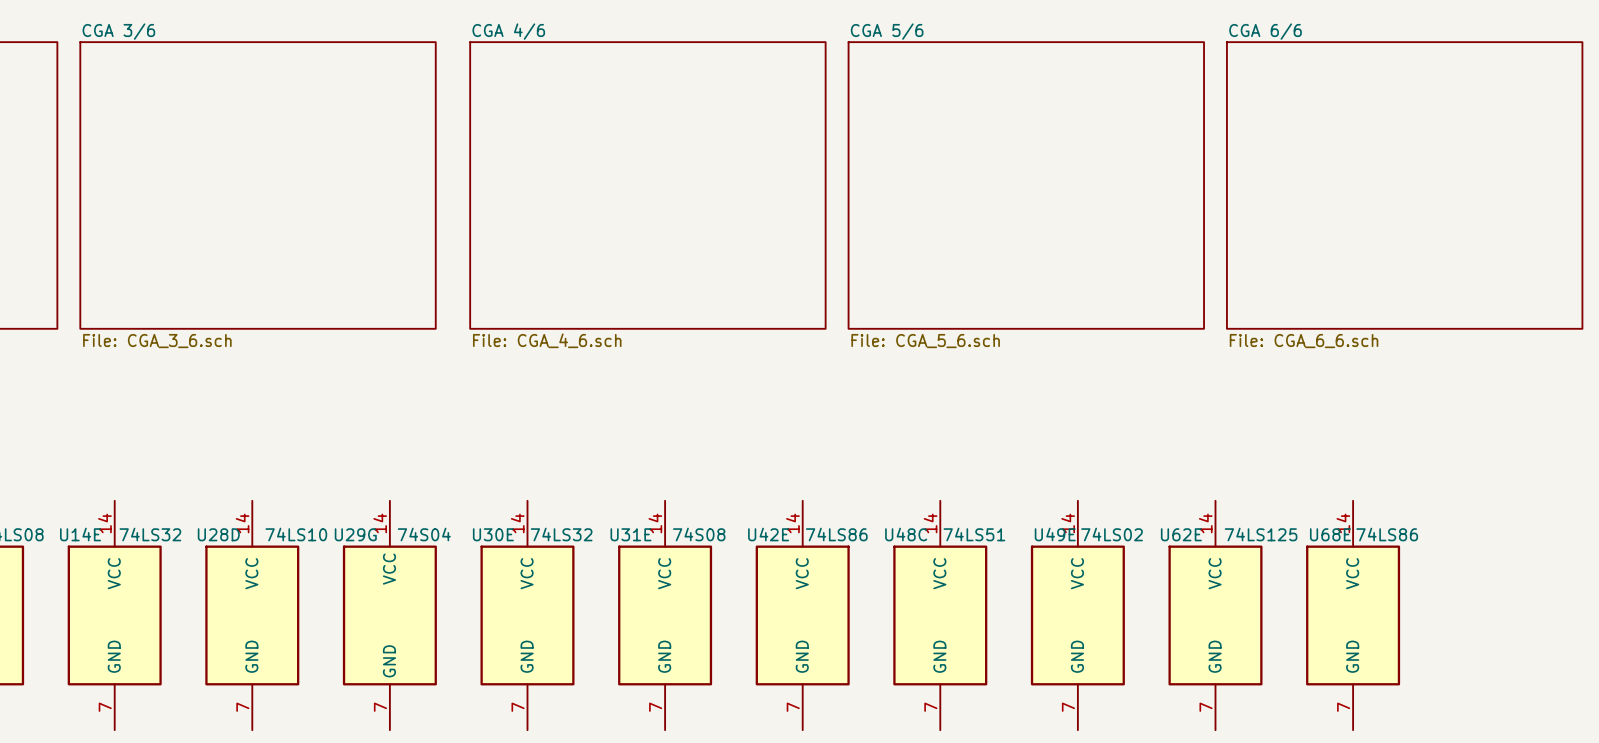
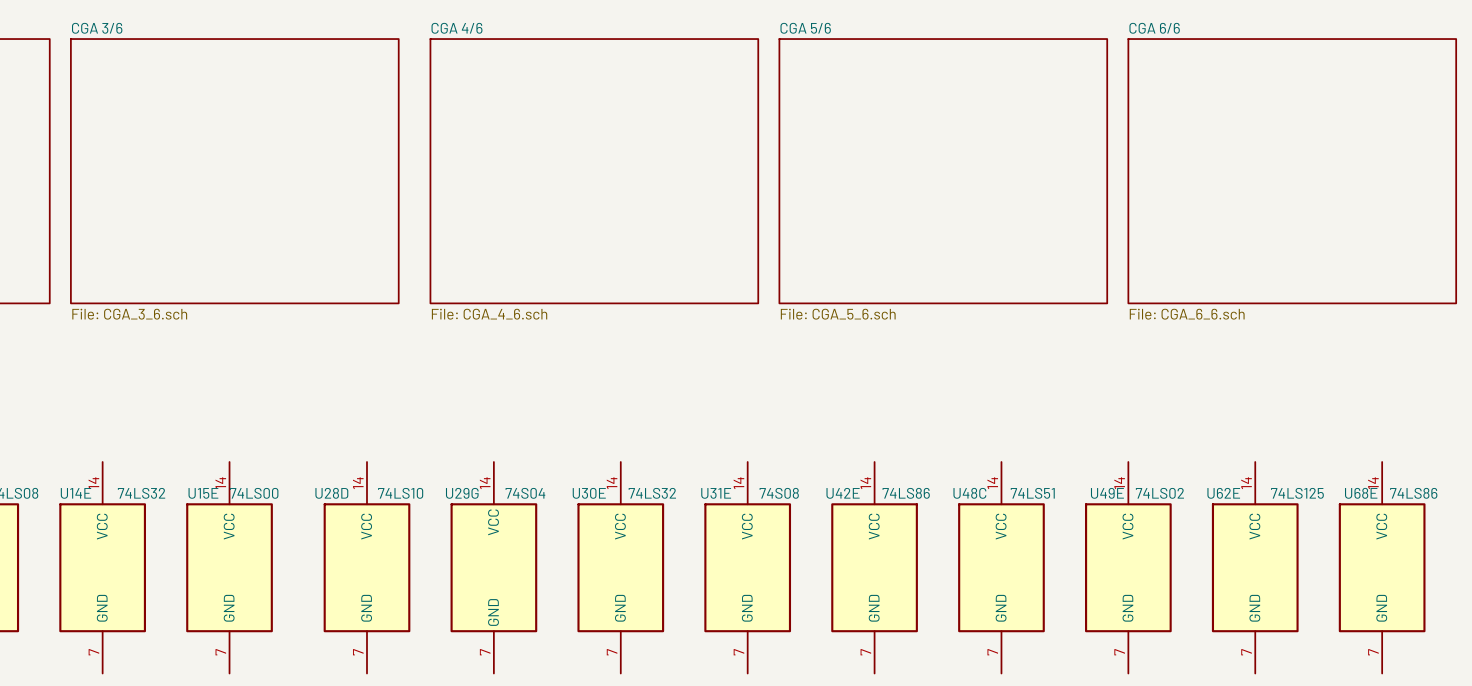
U28D name: U28D (218, 534) -> U15E (203, 493)
U28D value: 74LS10 (296, 534) -> 74LS00 (254, 493)
U29G position: (389, 615) -> (493, 567)
U28D: none -> 74LS10 (366, 567)
U30E position: (527, 615) -> (620, 567)
U31E position: (665, 615) -> (747, 567)
U42E position: (802, 615) -> (874, 567)
U48C position: (940, 615) -> (1001, 567)
U49E position: (1077, 615) -> (1128, 567)
U62E position: (1215, 615) -> (1255, 567)
U68E position: (1353, 615) -> (1382, 567)

